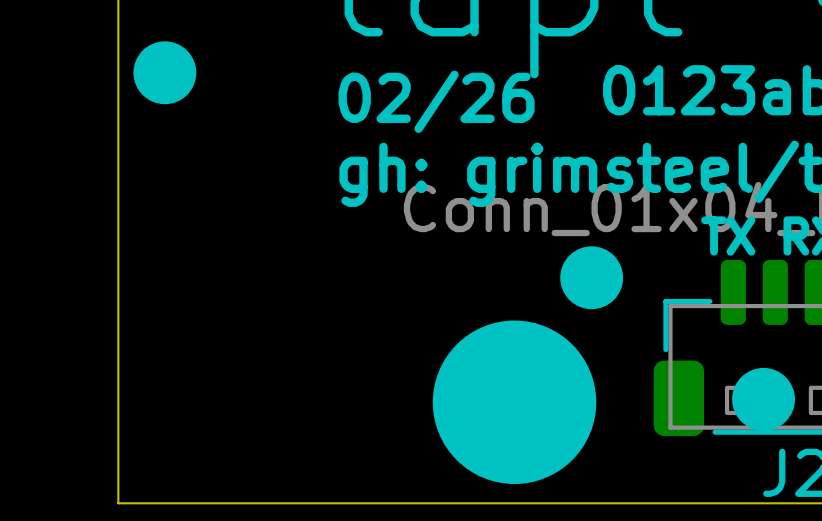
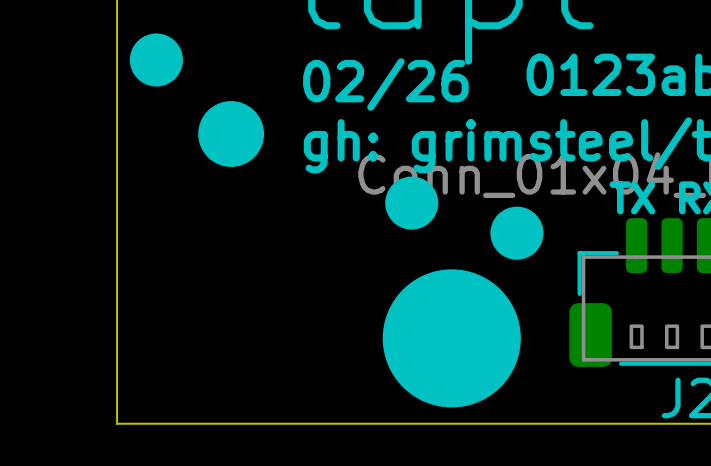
drawing: none -> [198, 101, 265, 167]
drawing position: (763, 399) -> (411, 203)

